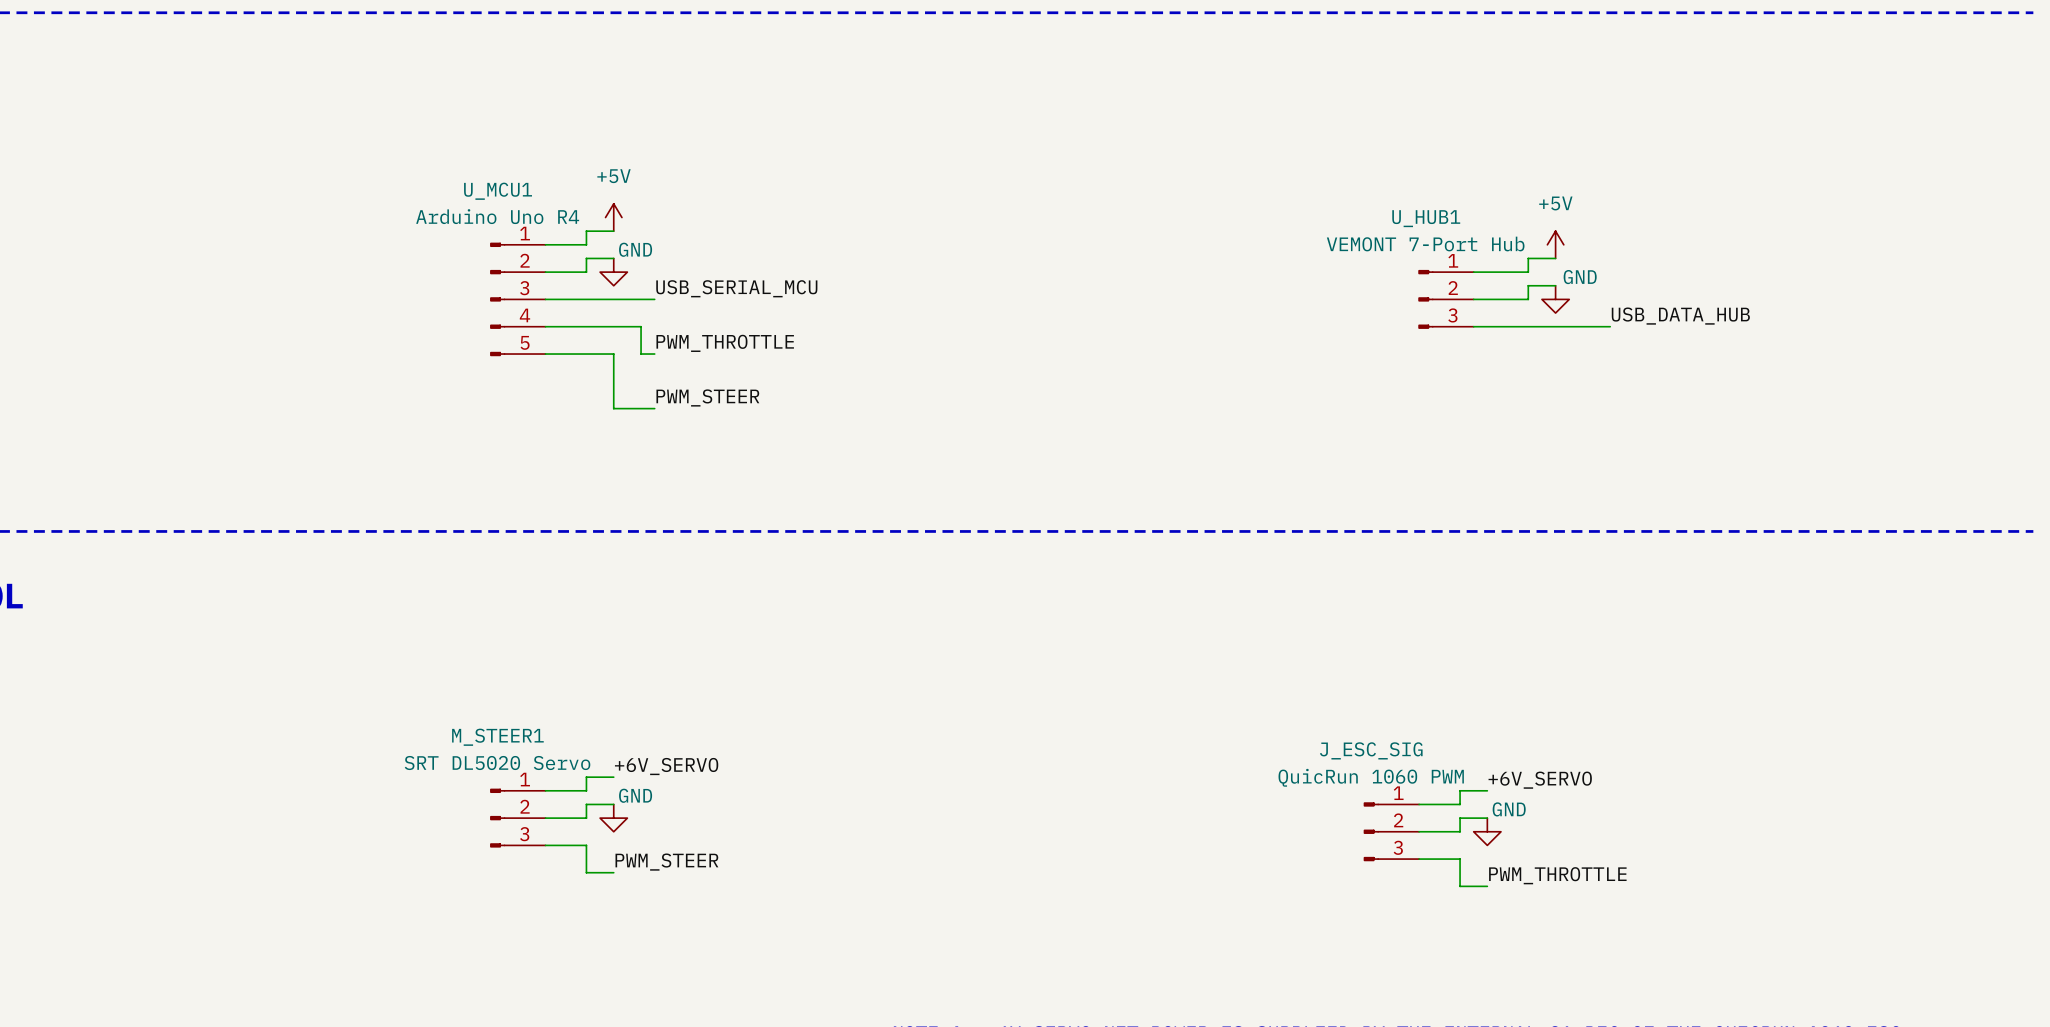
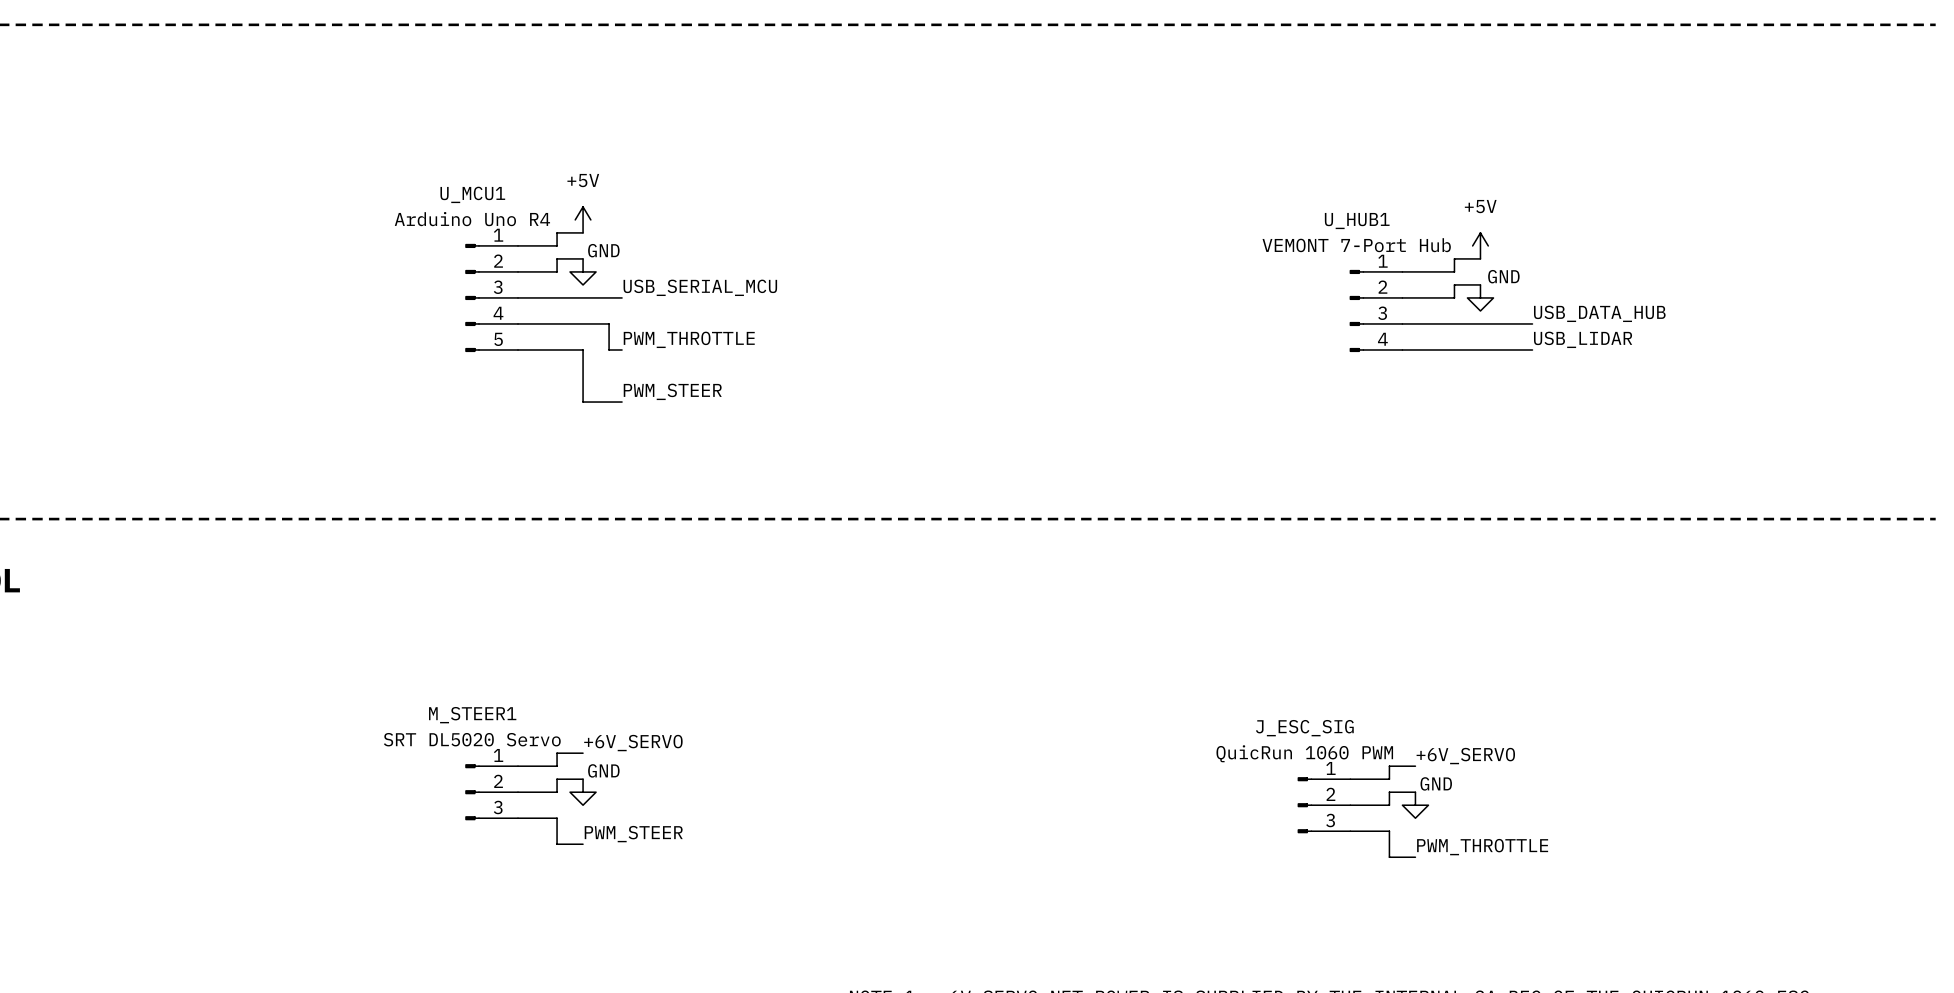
U_HUB1 symbol: [1418, 269, 1474, 329] -> [1349, 269, 1403, 353]
label: none -> USB_LIDAR (1583, 339)
wire: none -> (1402, 349) (1532, 349)

